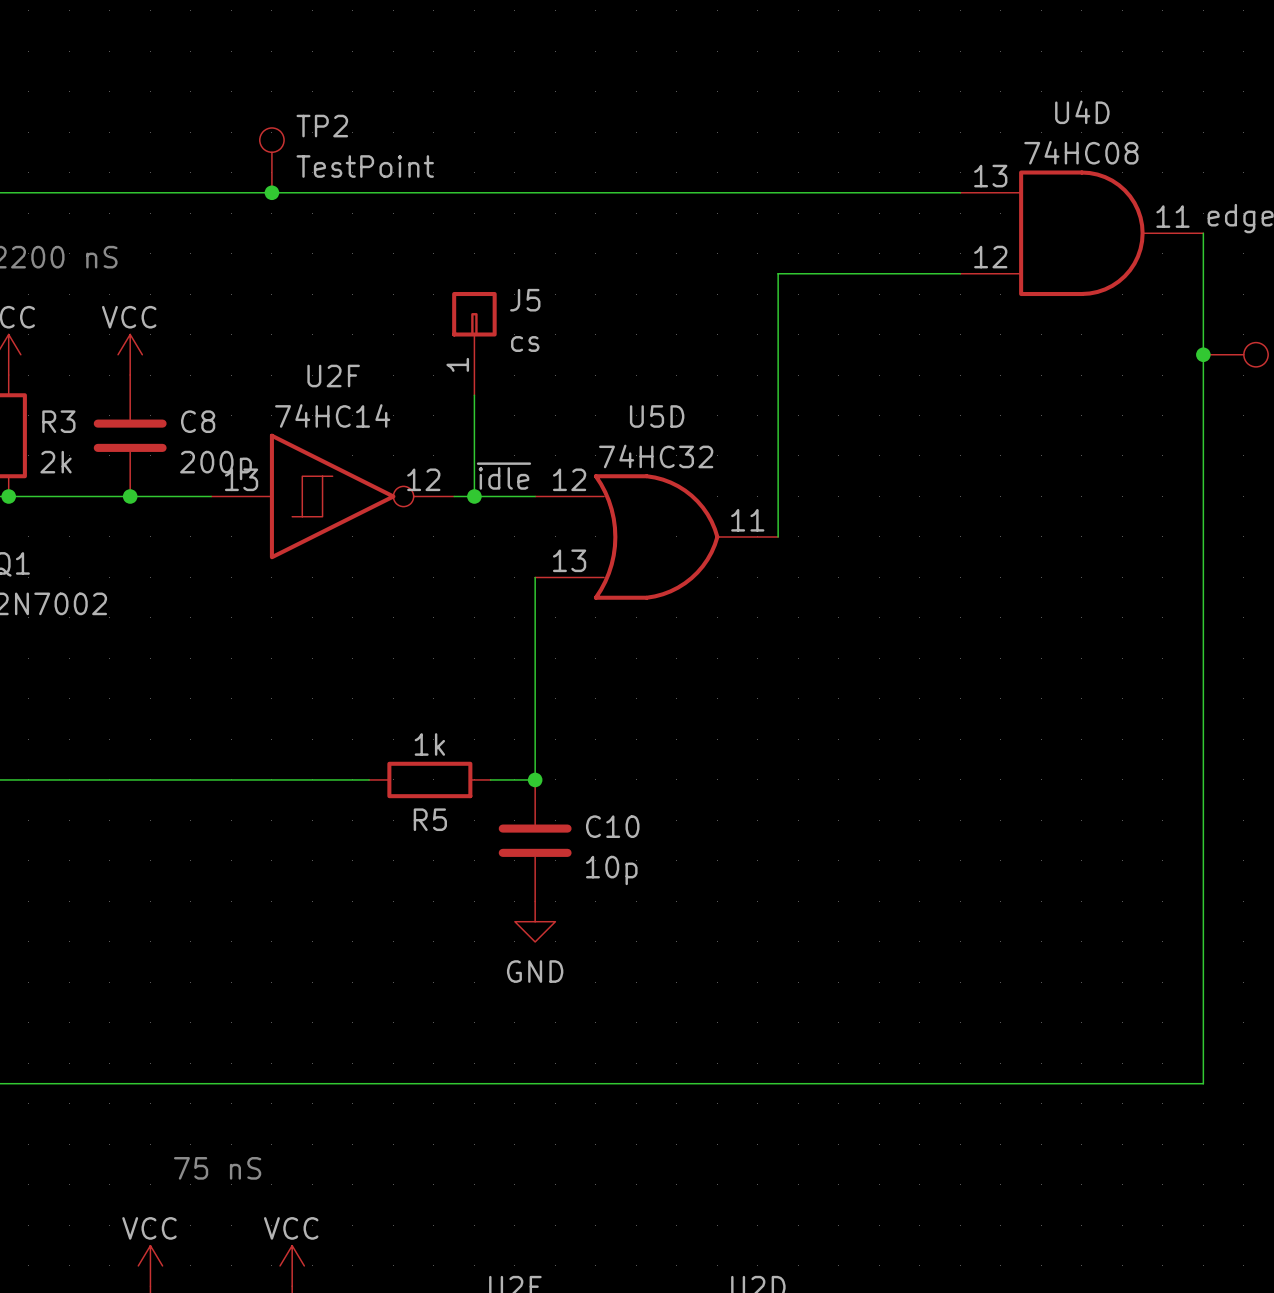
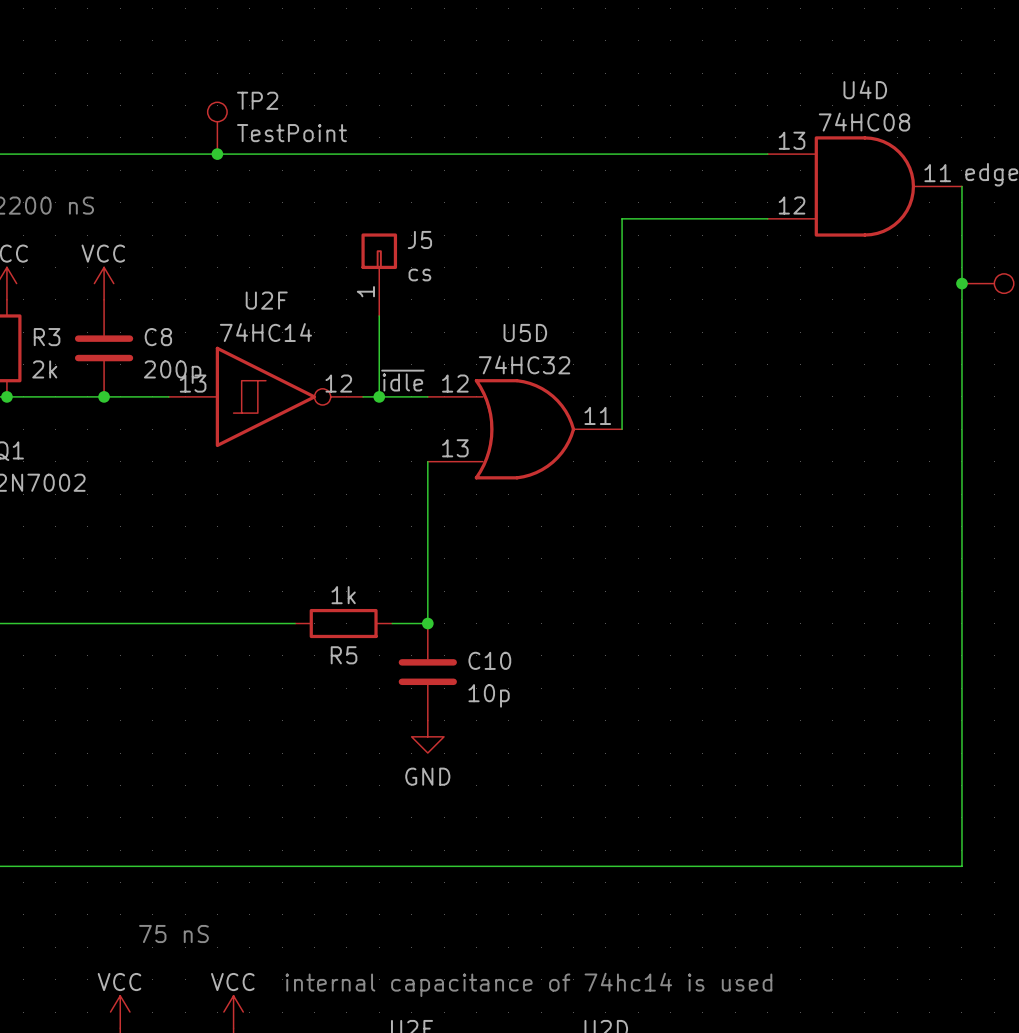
text: none -> internal capacitance of 74hc14 is used (528, 984)

